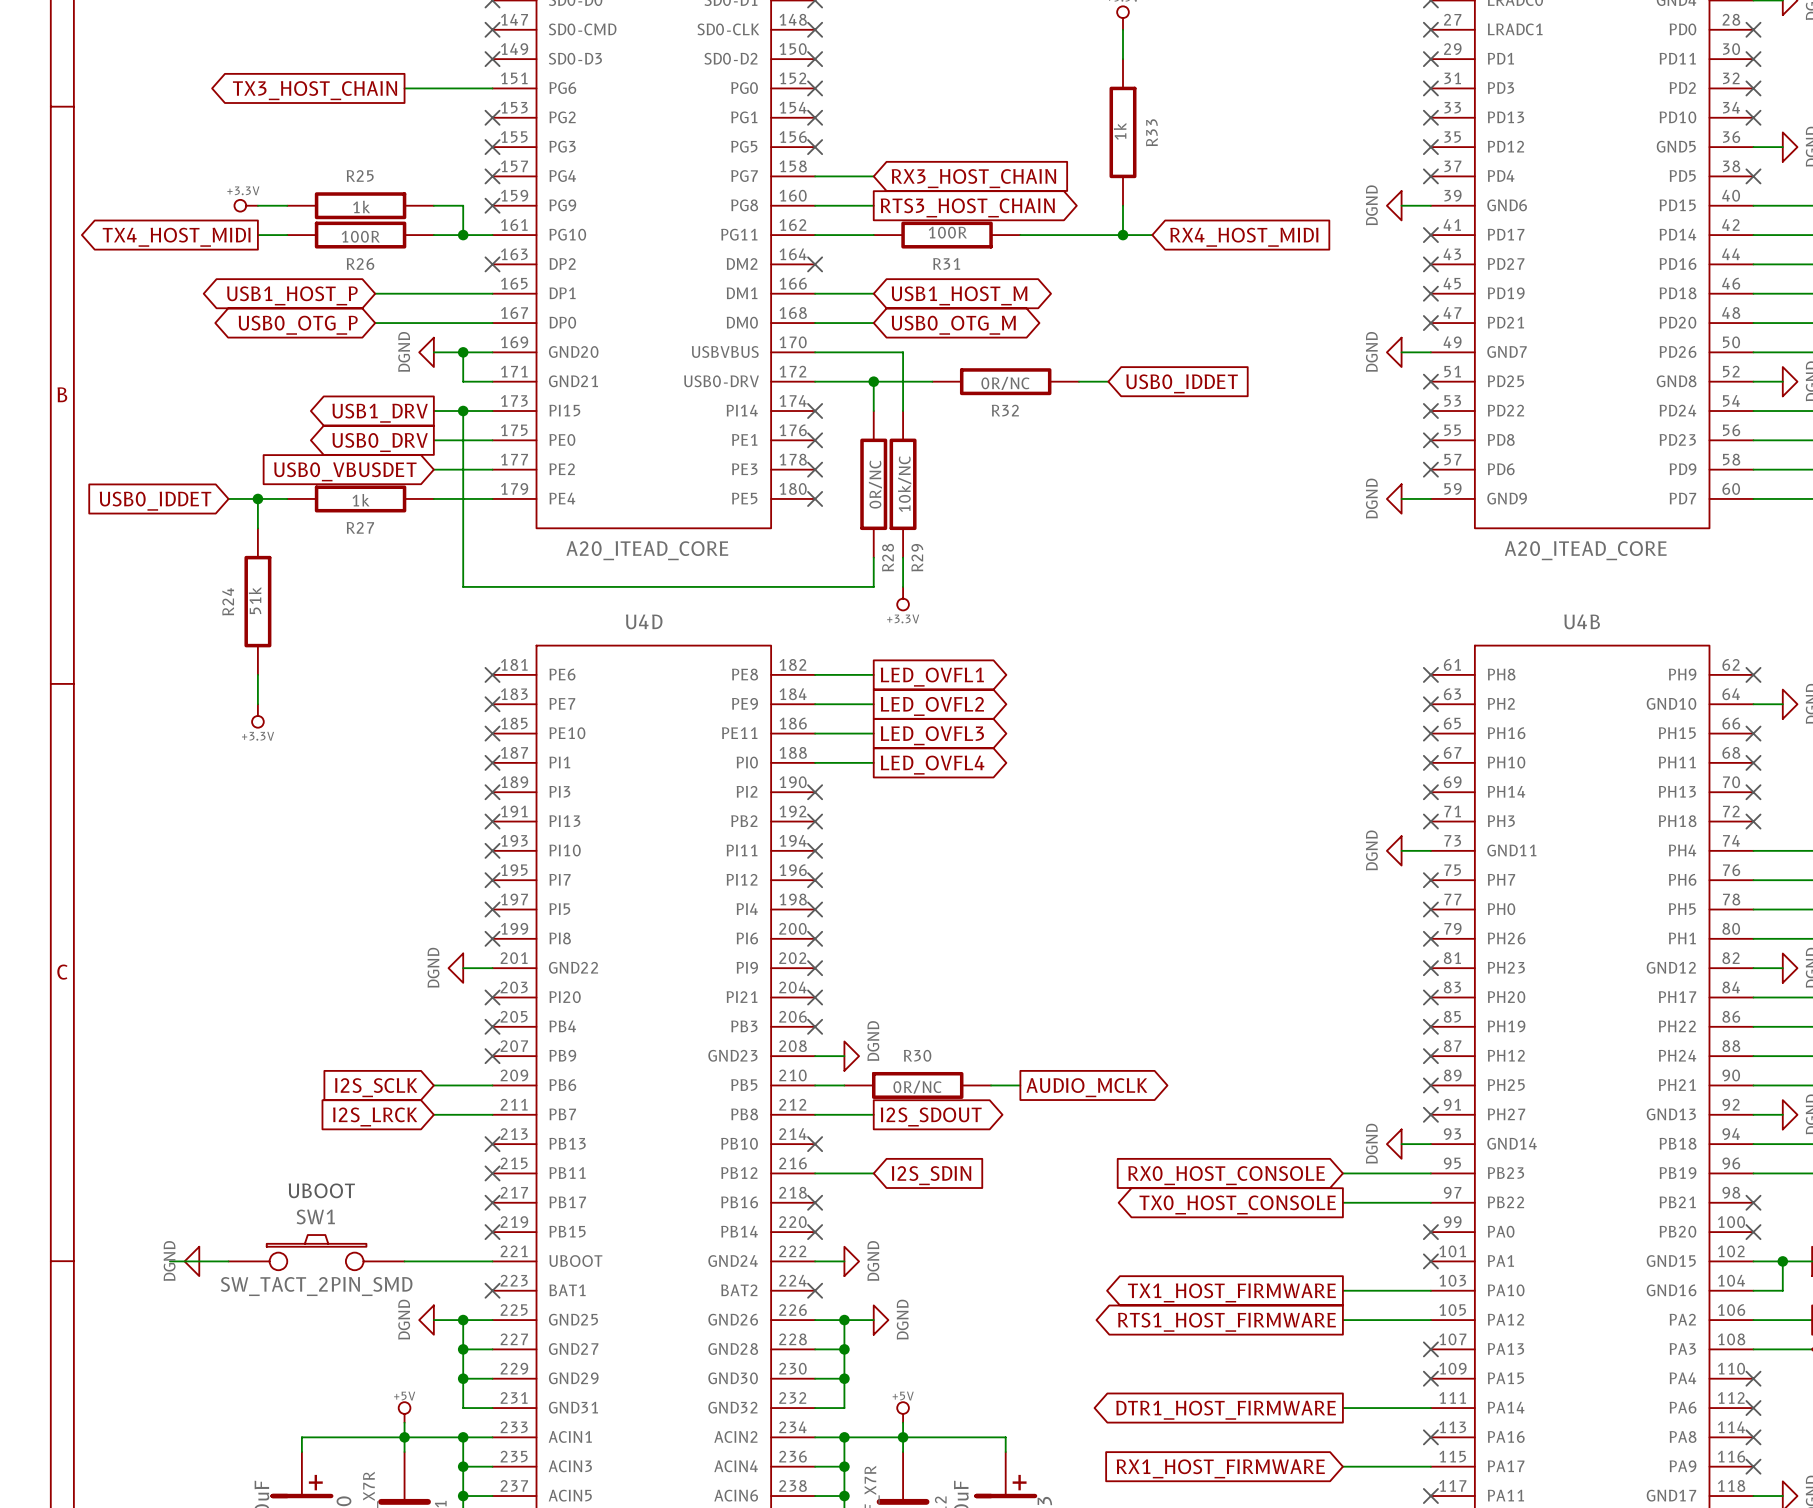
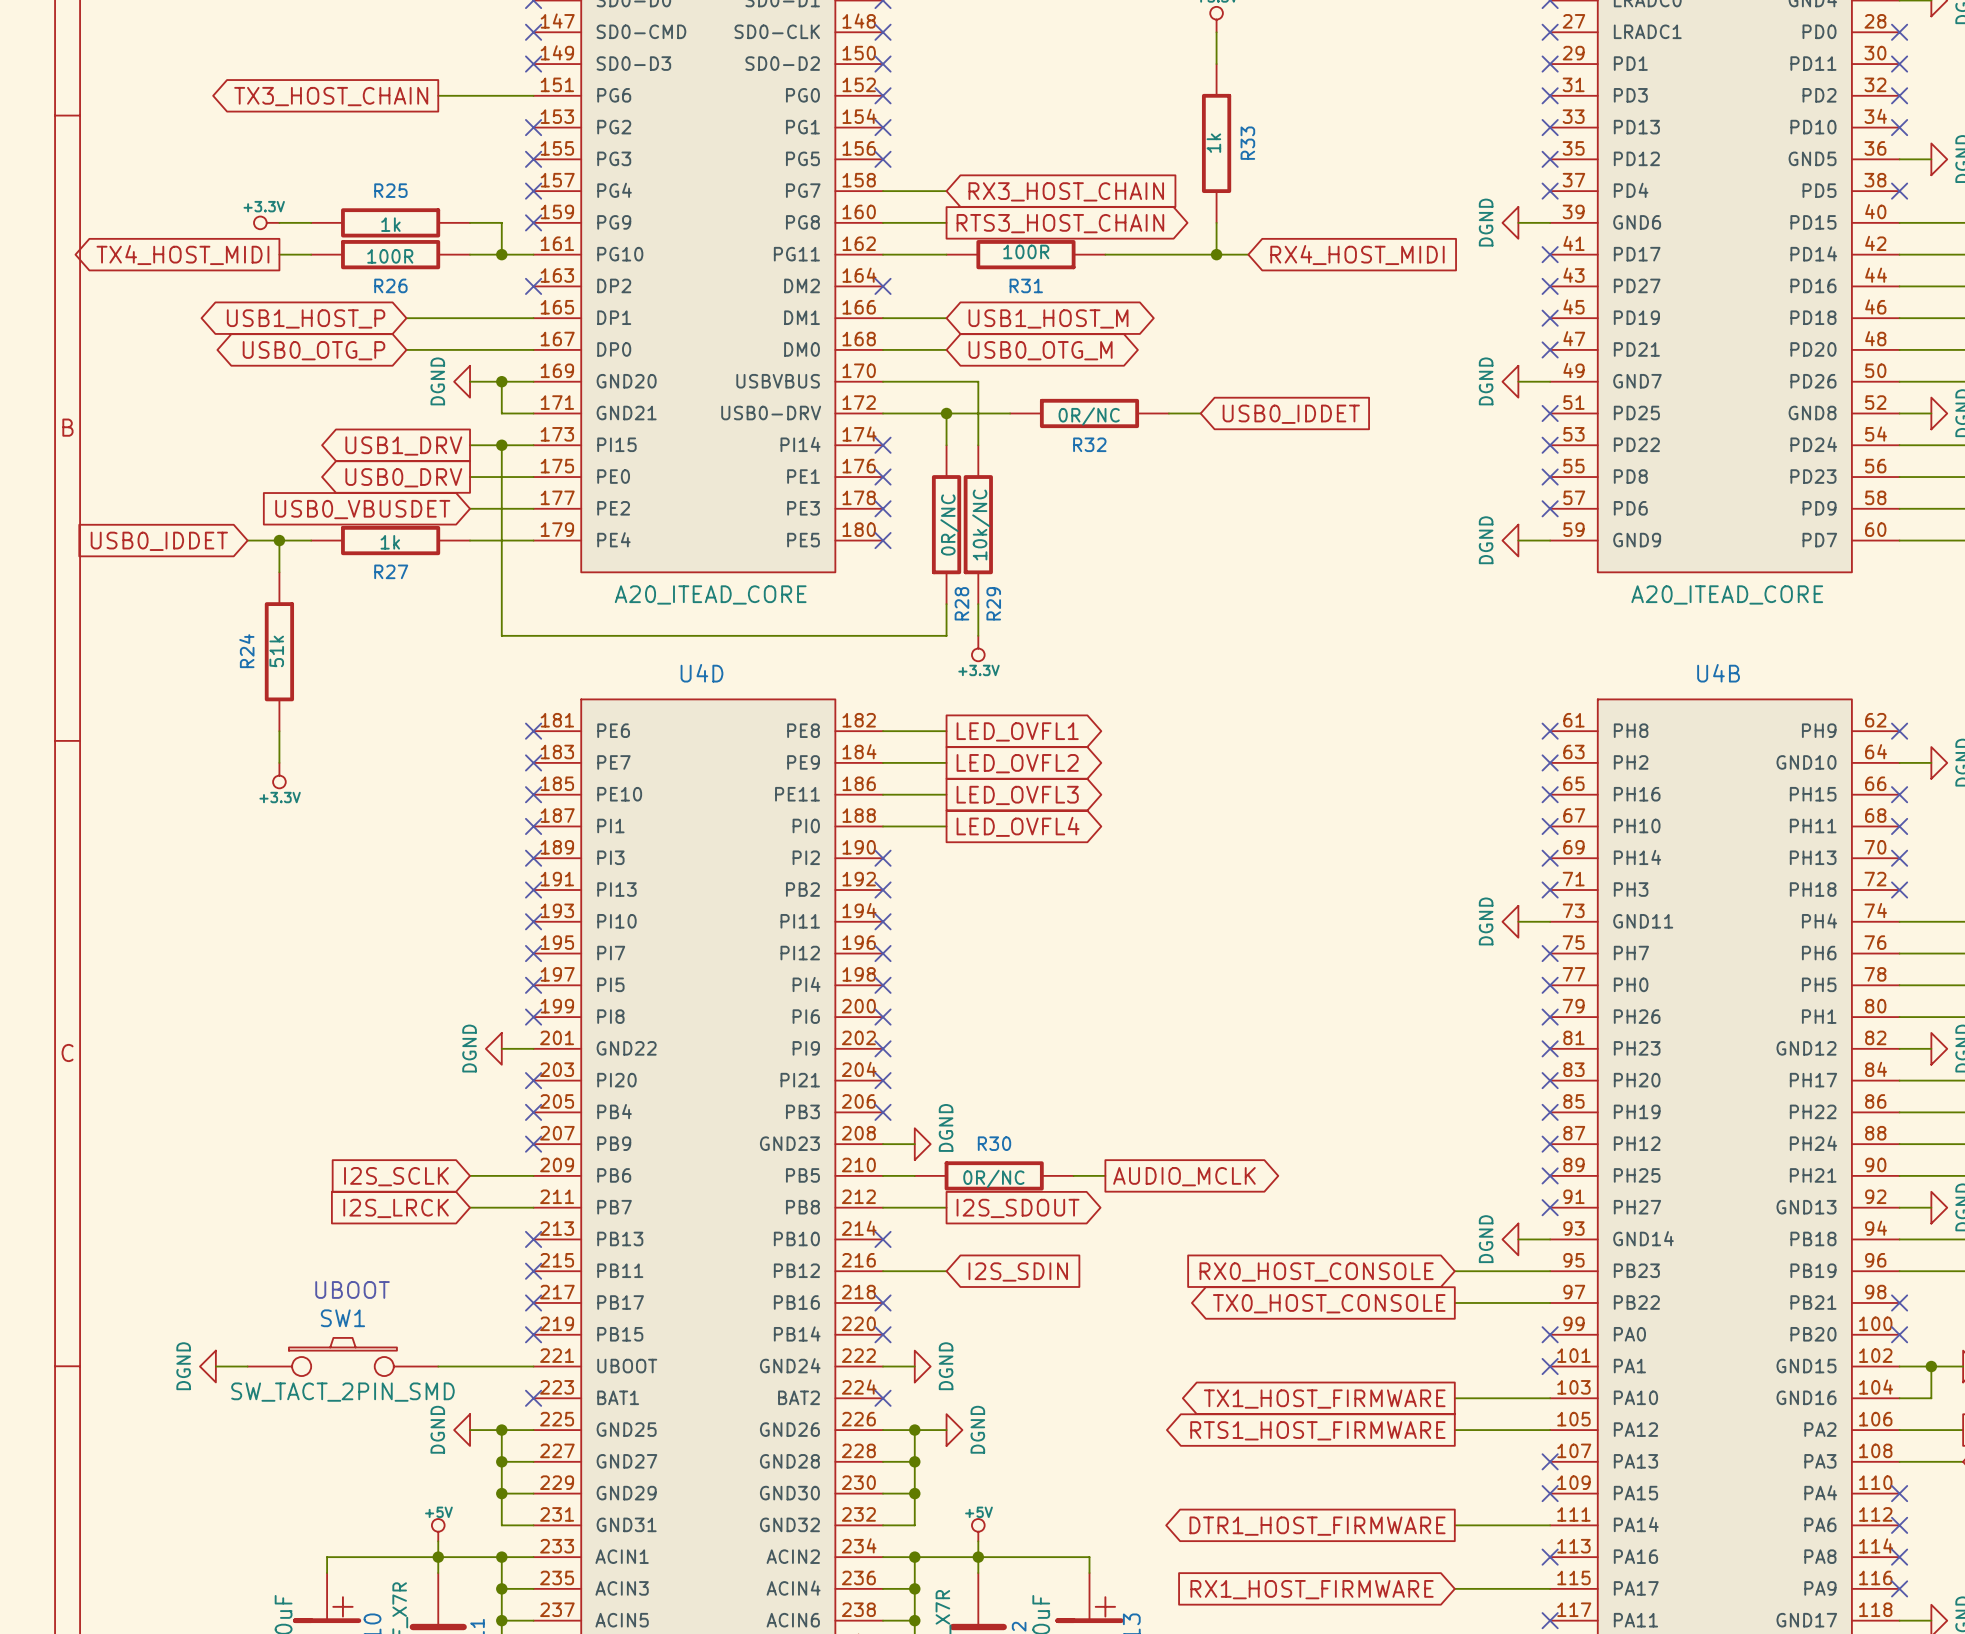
wire: (169, 1261) (199, 1261) -> none

